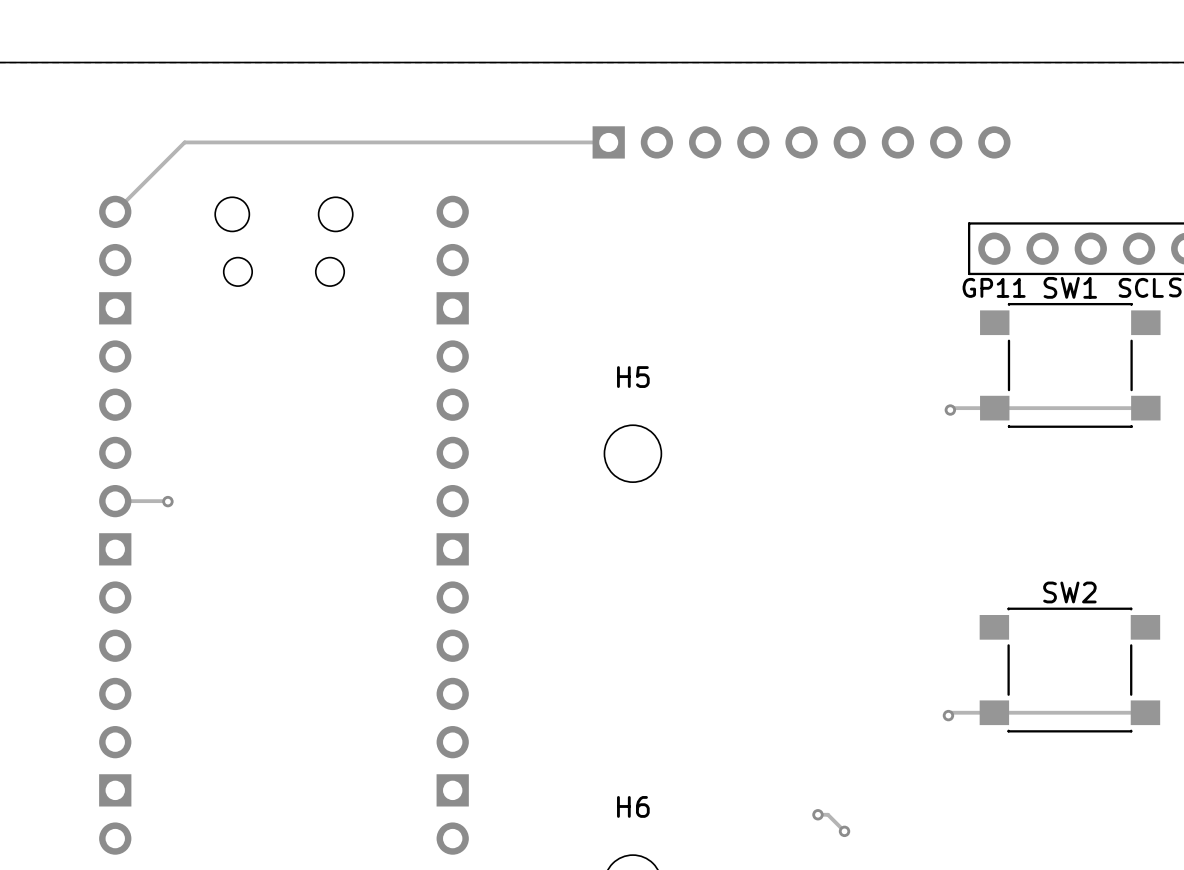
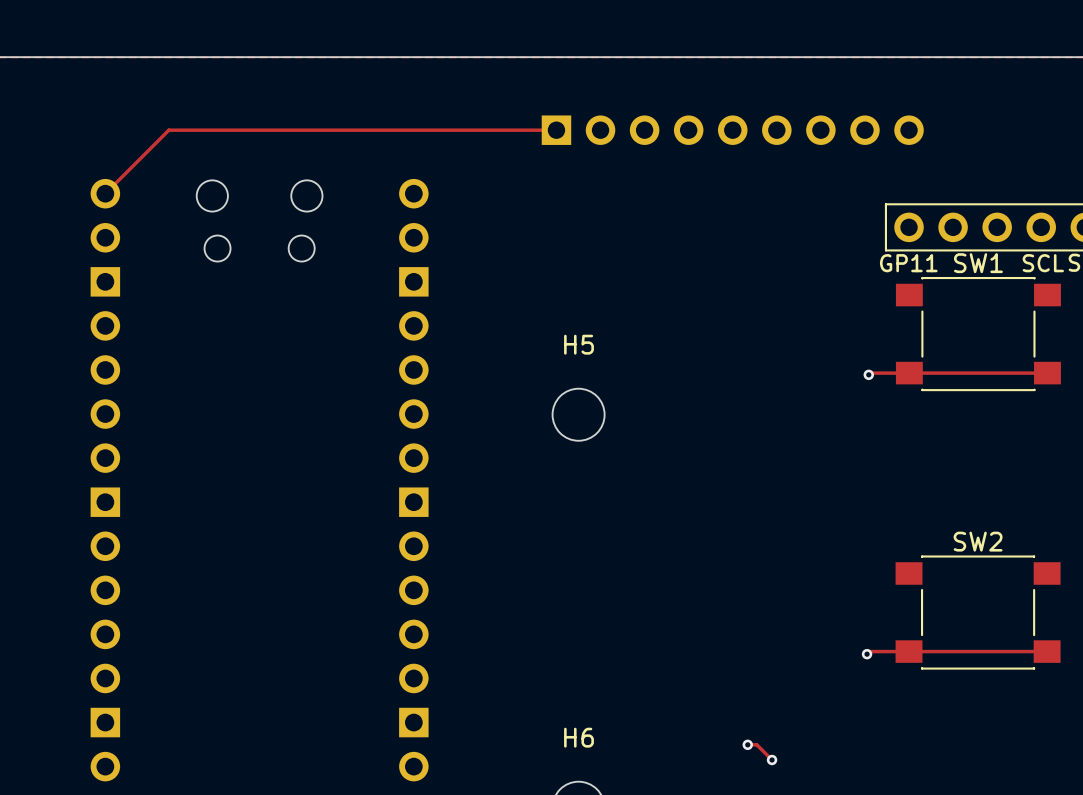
track: (115, 501) (167, 501) -> none
via: (167, 501) -> none

